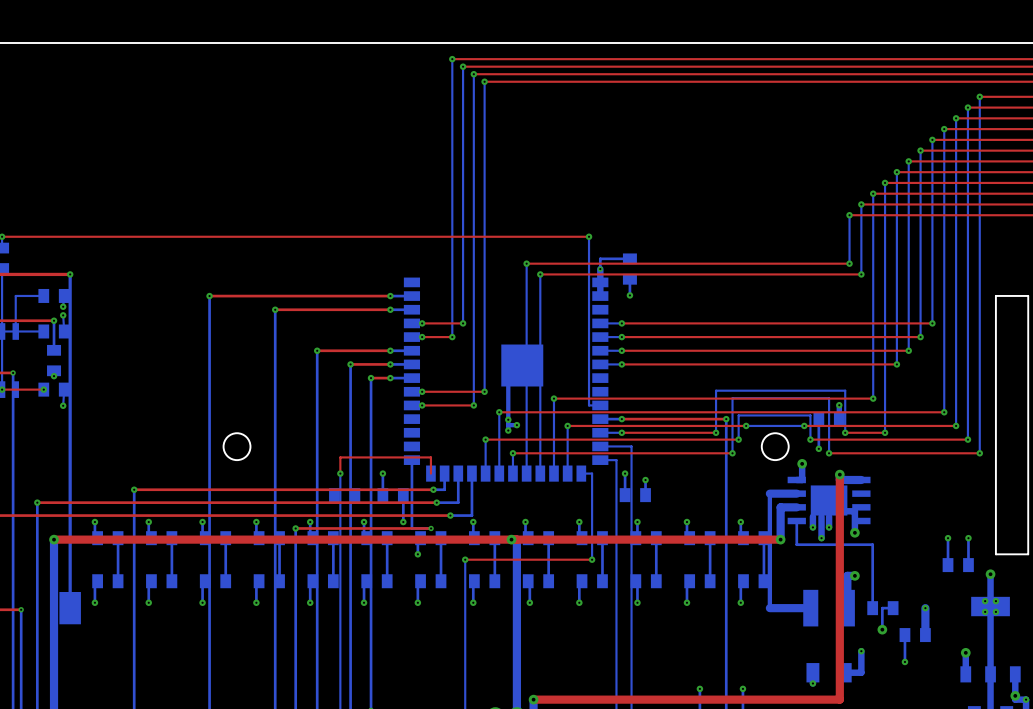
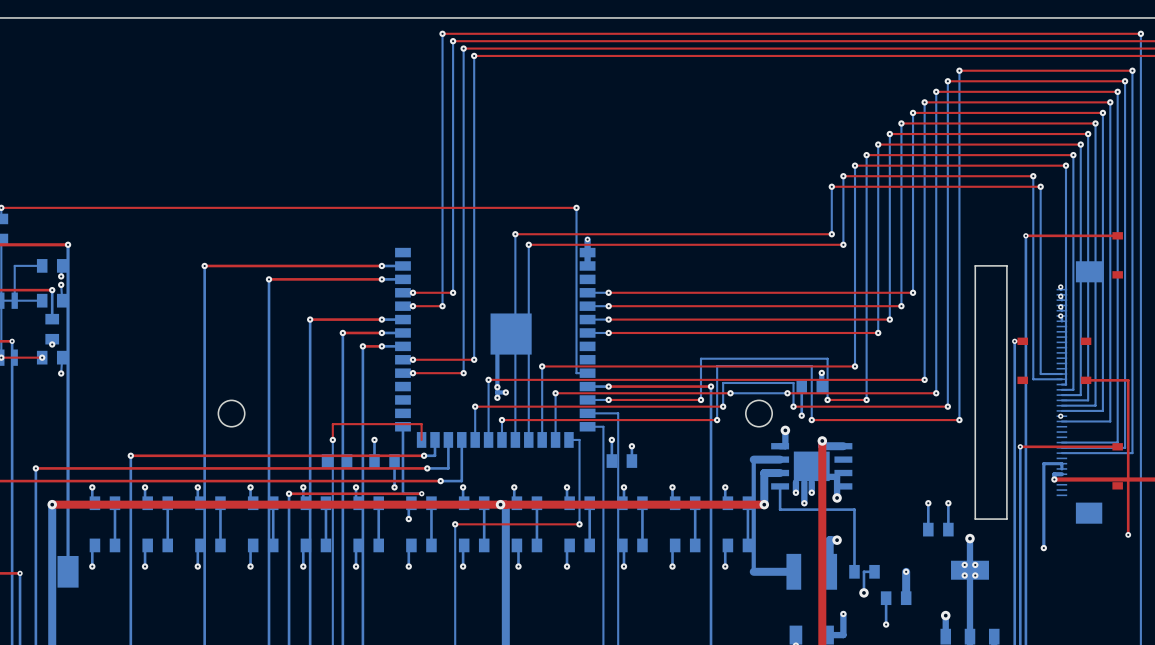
bottom track: (629, 258) (600, 258) (600, 269) -> none
part: (629, 269) -> none
bottom track: (629, 279) (629, 295) -> none
via: (629, 295) -> none

